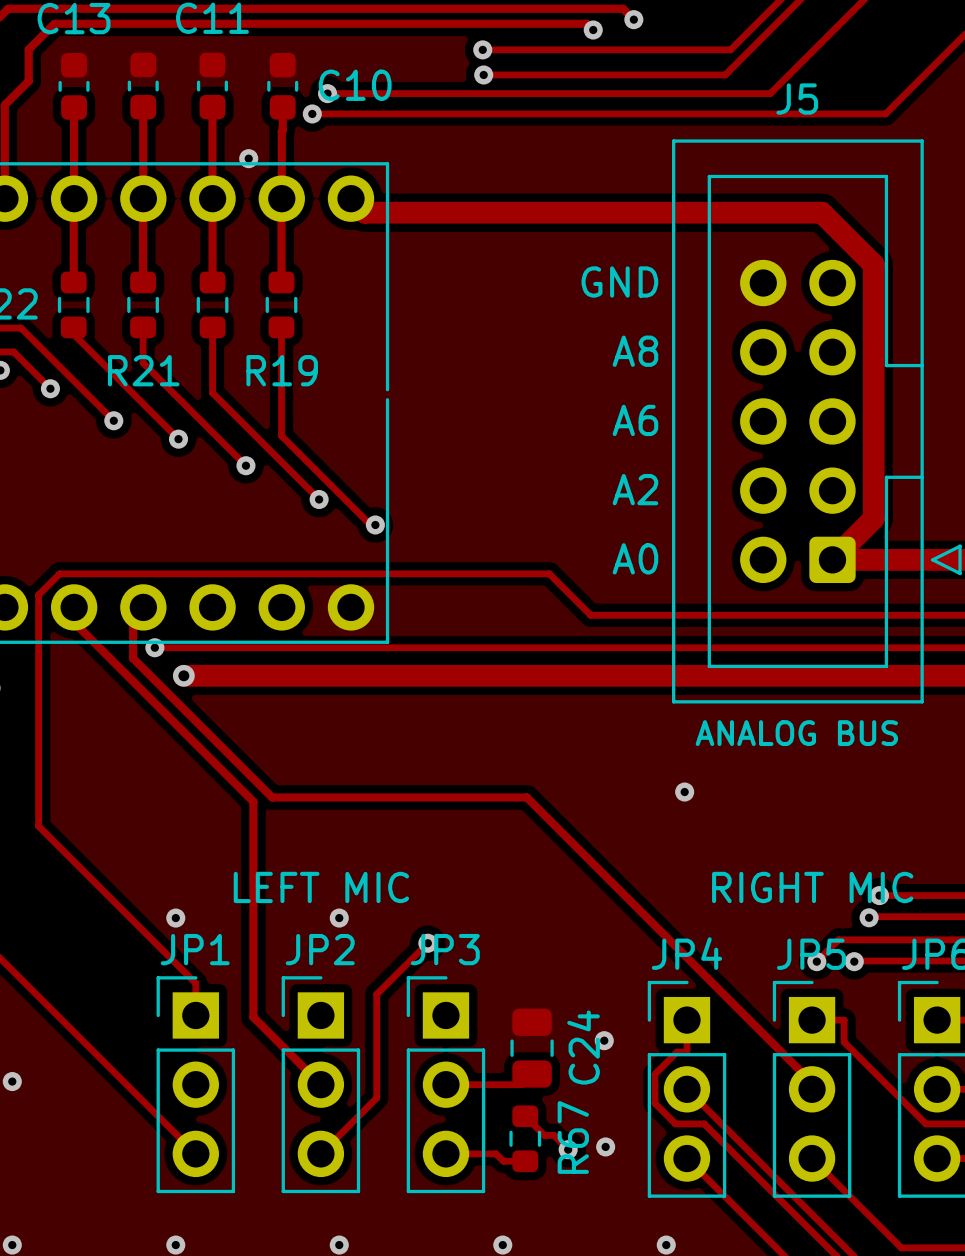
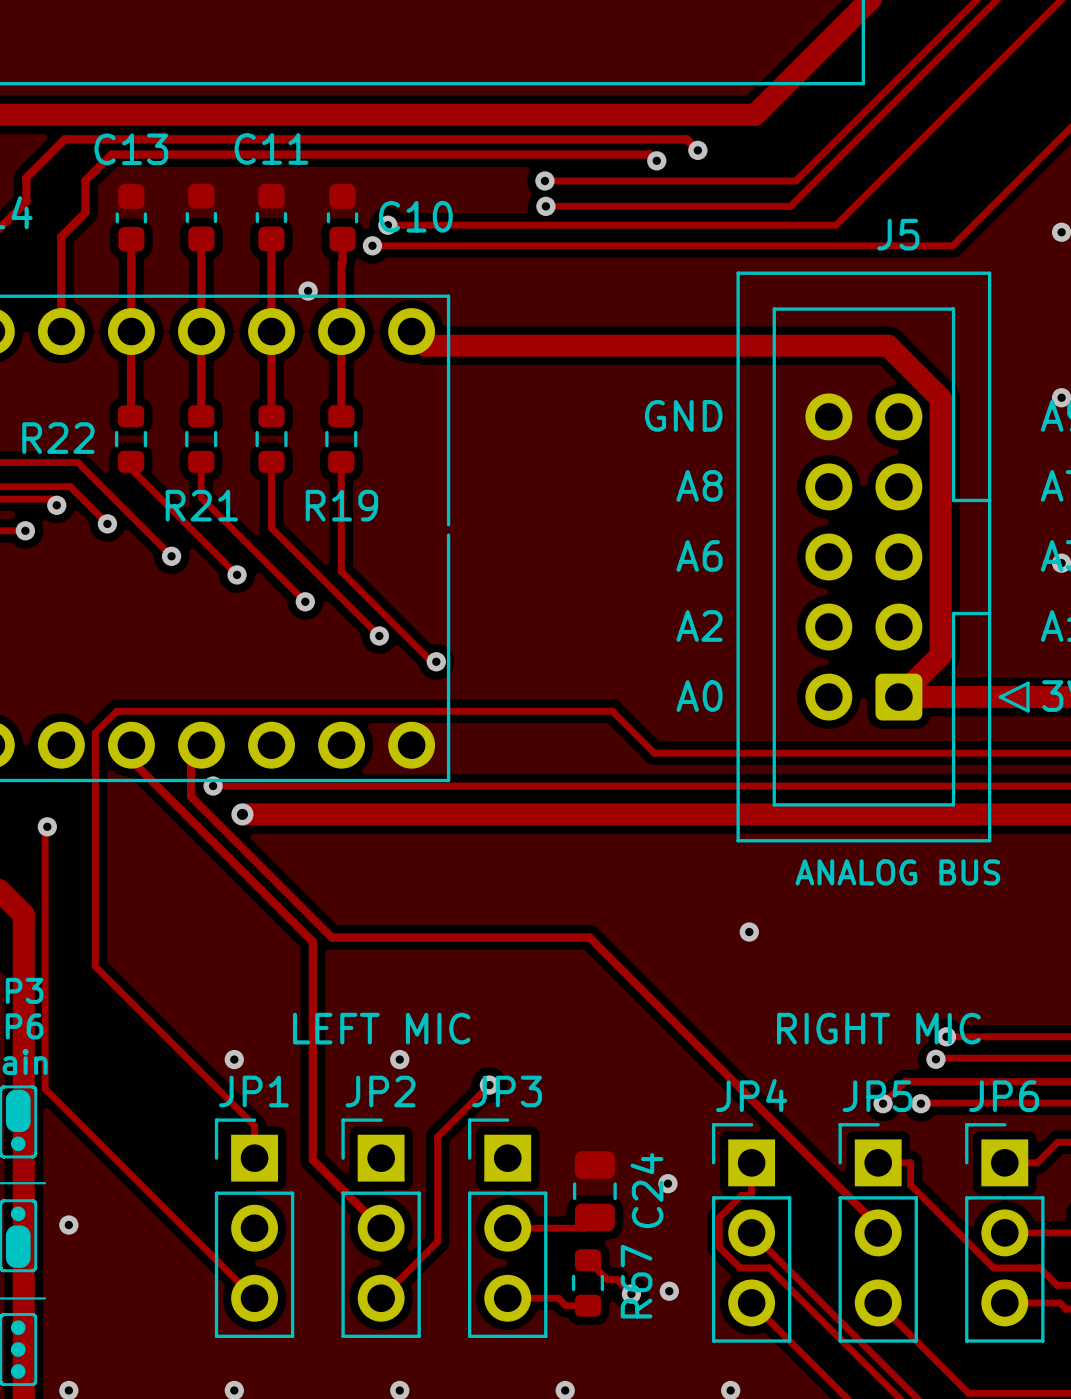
J5 name position: J5 (797, 99) -> J5 (898, 234)
text position: ANALOG BUS (796, 733) -> ANALOG BUS (897, 872)

